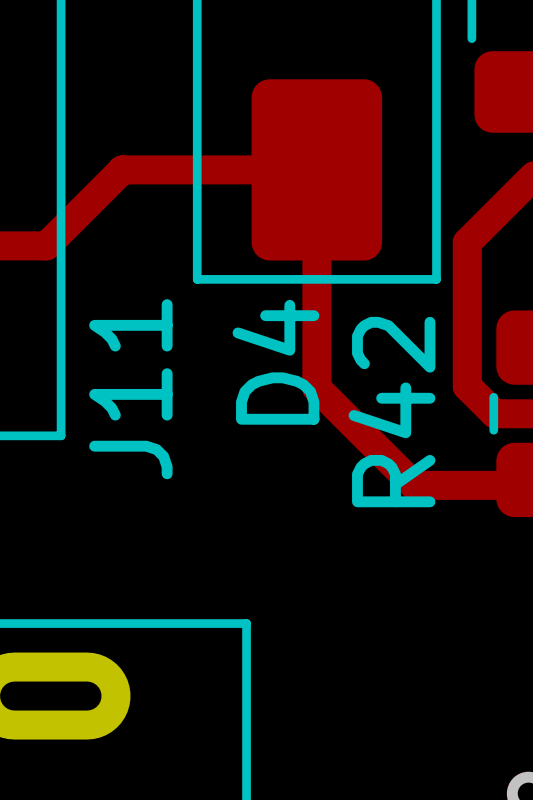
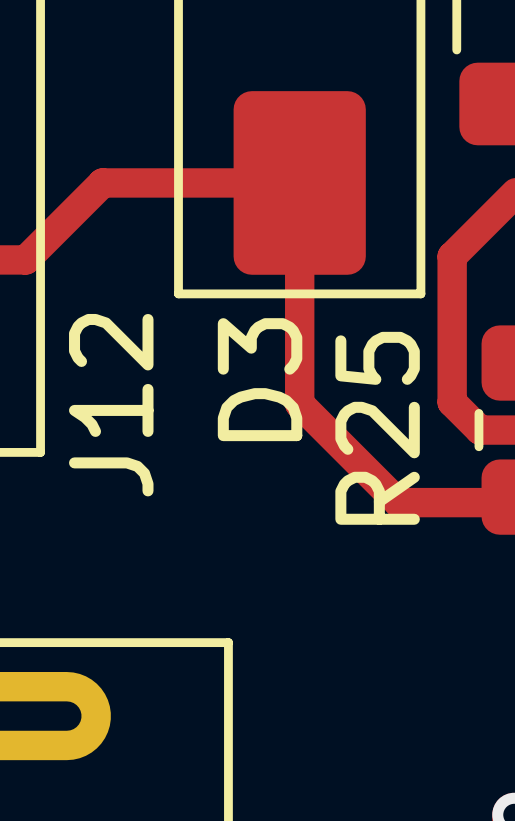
D4 name: D4 (276, 362) -> D3 (260, 379)
J11 name: J11 (130, 389) -> J12 (111, 405)
R42 name: R42 (392, 412) -> R25 (377, 428)

